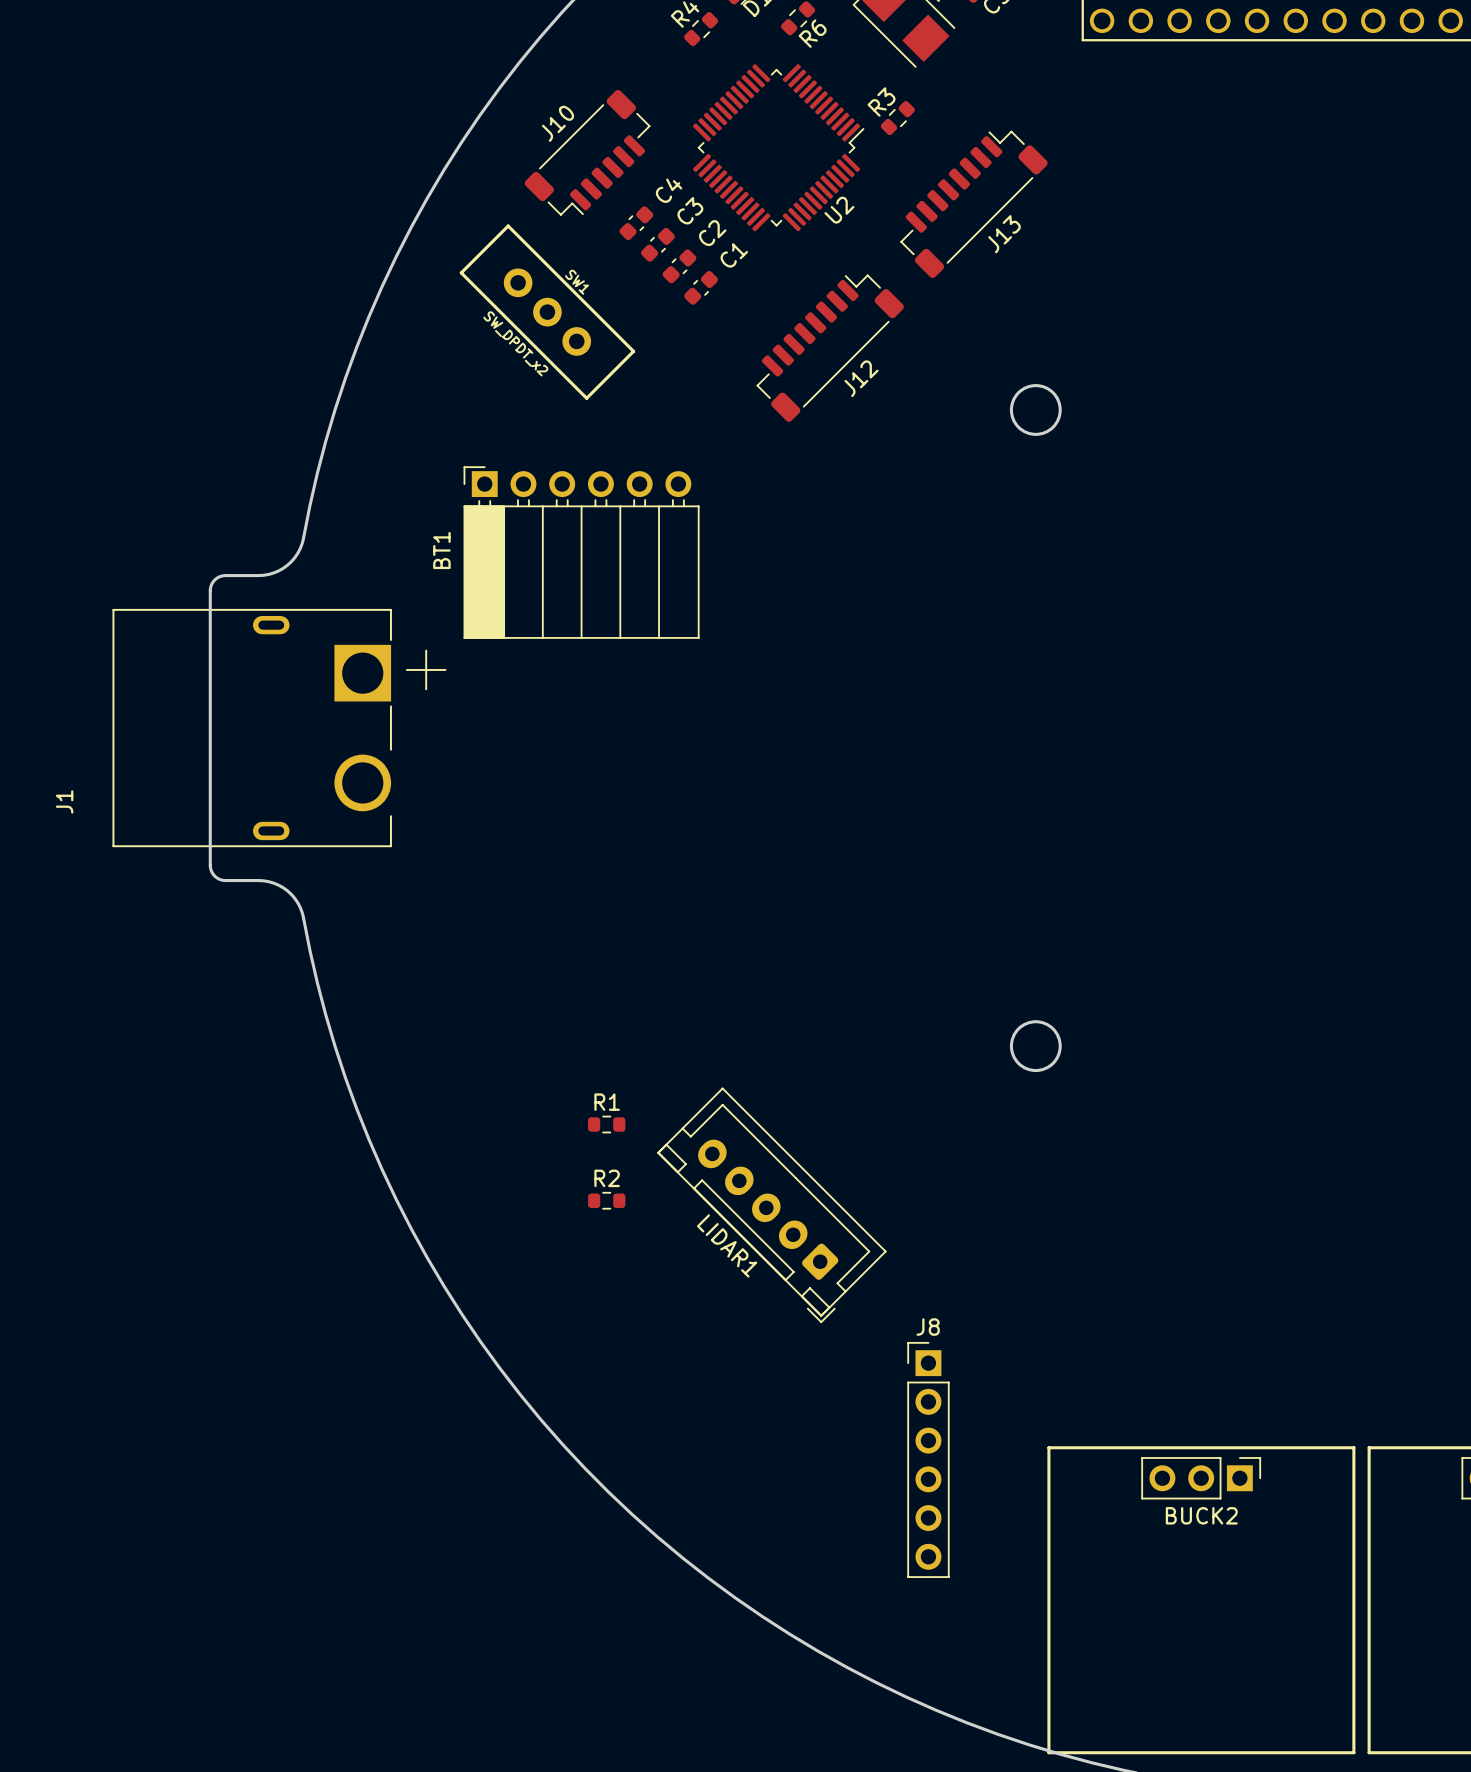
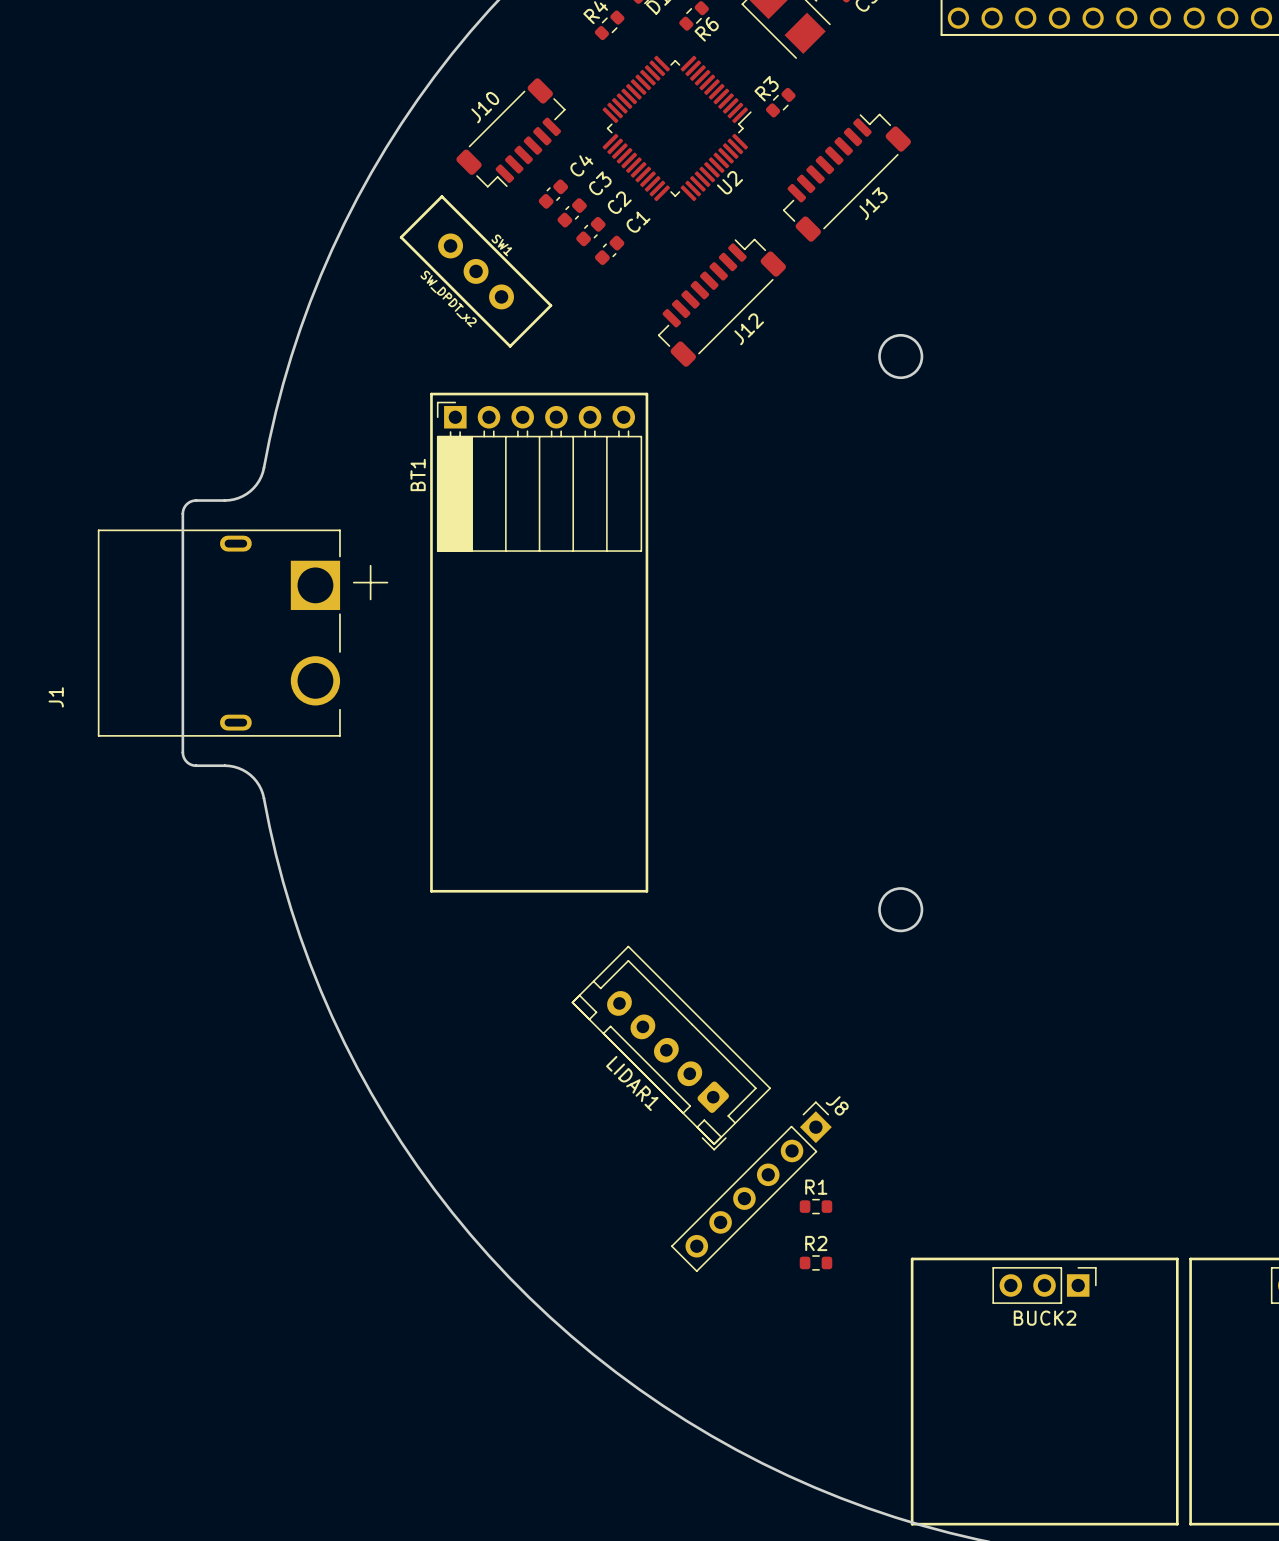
line: none -> (431, 394) (646, 394) (646, 891) (431, 891) (431, 394)
BT1 position: (581, 552) -> (539, 476)
R1 position: (606, 1124) -> (816, 1206)
R2 position: (606, 1200) -> (816, 1262)
J8 rotation: 0° (928, 1459) -> 45° clockwise (751, 1186)

